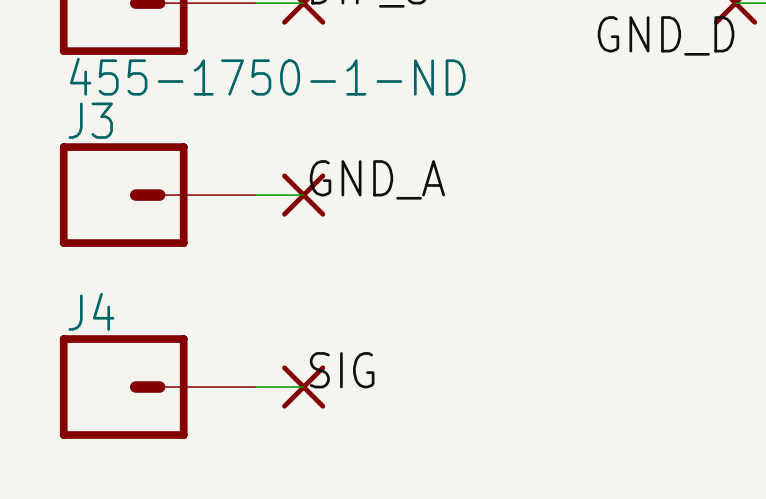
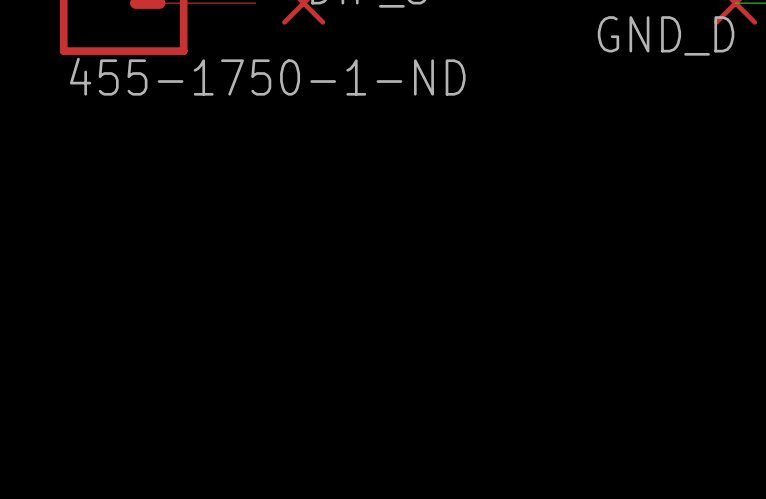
wire: (255, 3) (303, 3) -> none
label: GND_A (377, 179) -> none
J3: (157, 195) -> none
wire: (255, 195) (303, 195) -> none
part: (303, 195) -> none
label: SIG (342, 370) -> none
J4: (157, 387) -> none
wire: (255, 387) (303, 387) -> none
part: (303, 387) -> none

